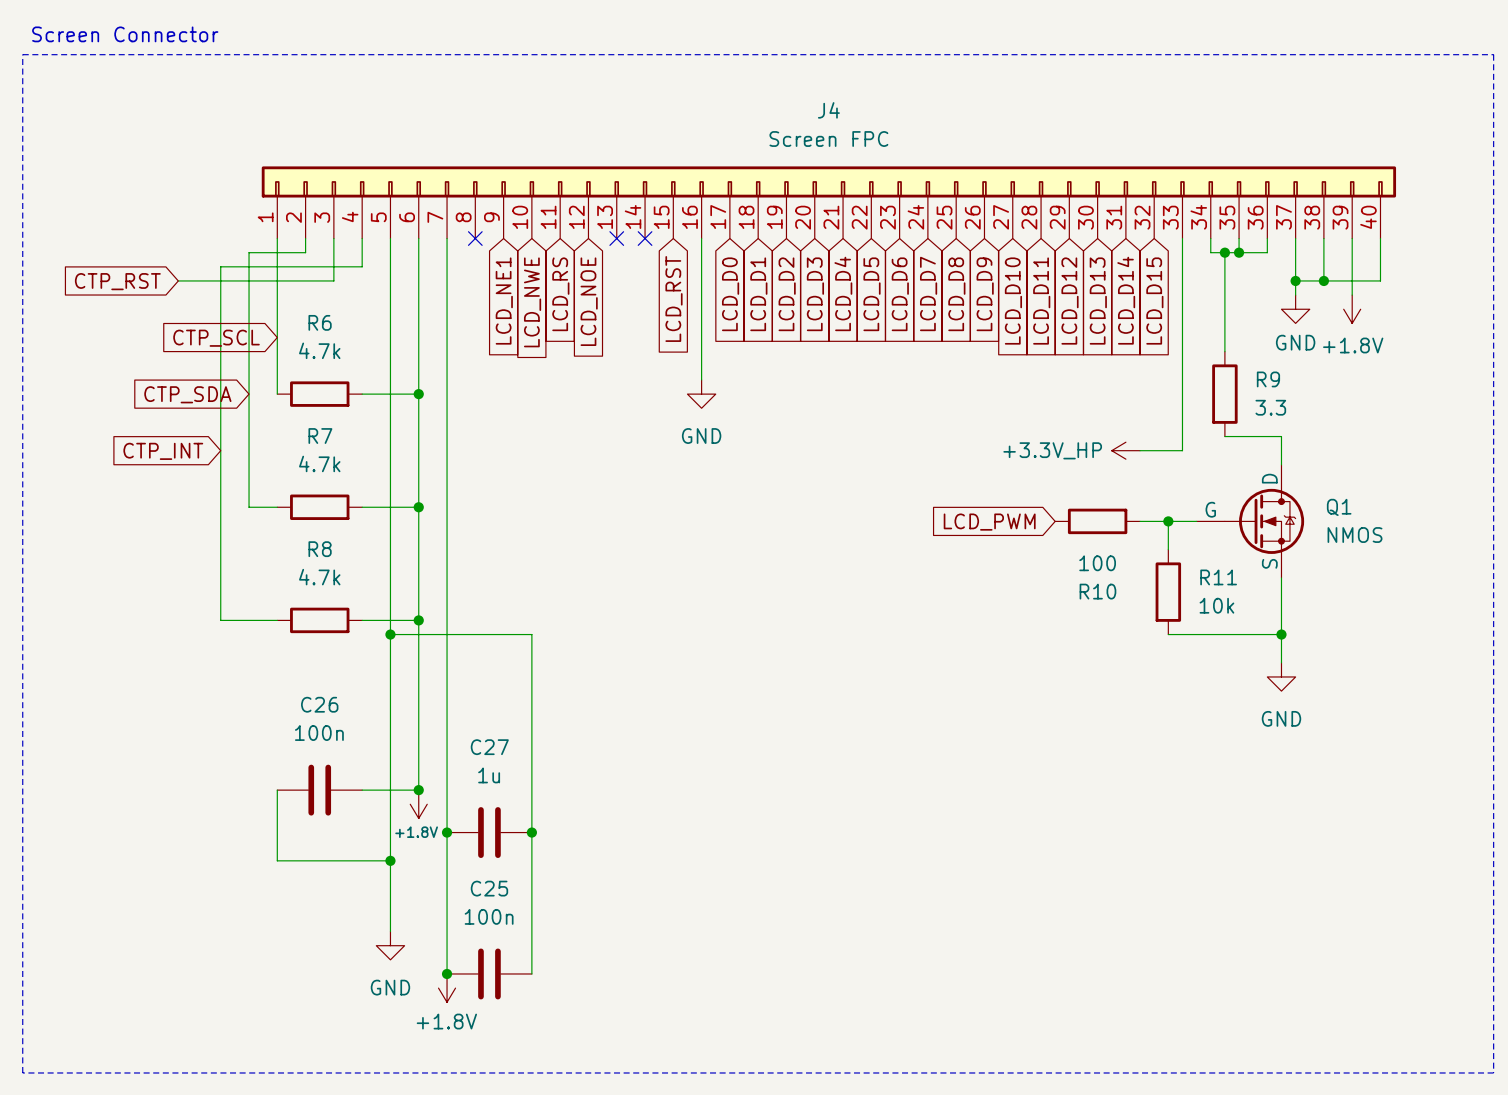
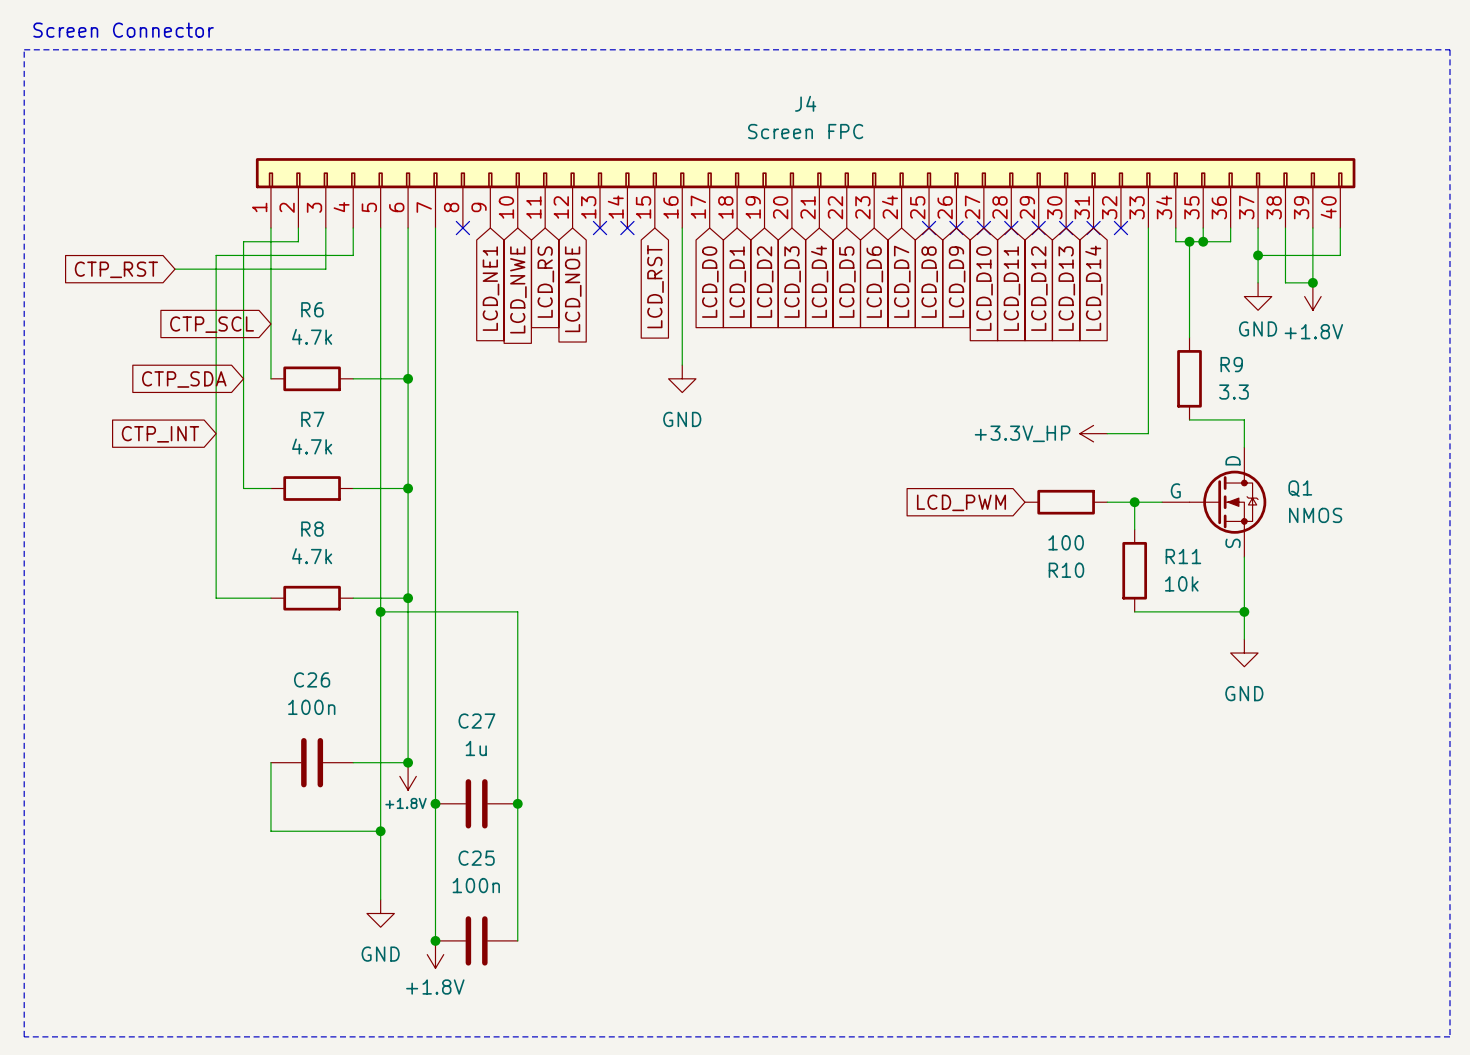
no-connect mark: none -> (929, 228)
no-connect mark: none -> (956, 228)
no-connect mark: none -> (983, 228)
no-connect mark: none -> (1011, 228)
no-connect mark: none -> (1038, 228)
no-connect mark: none -> (1066, 228)
no-connect mark: none -> (1093, 228)
no-connect mark: none -> (1120, 228)
wire: (1380, 266) (1380, 280) (1295, 280) -> (1340, 255) (1258, 255)
junction position: (1295, 280) -> (1258, 255)
wire: none -> (1285, 269) (1285, 282) (1312, 282)
junction: (1323, 280) -> none
junction: none -> (1312, 282)
global label: LCD_D15 (1154, 301) -> none

